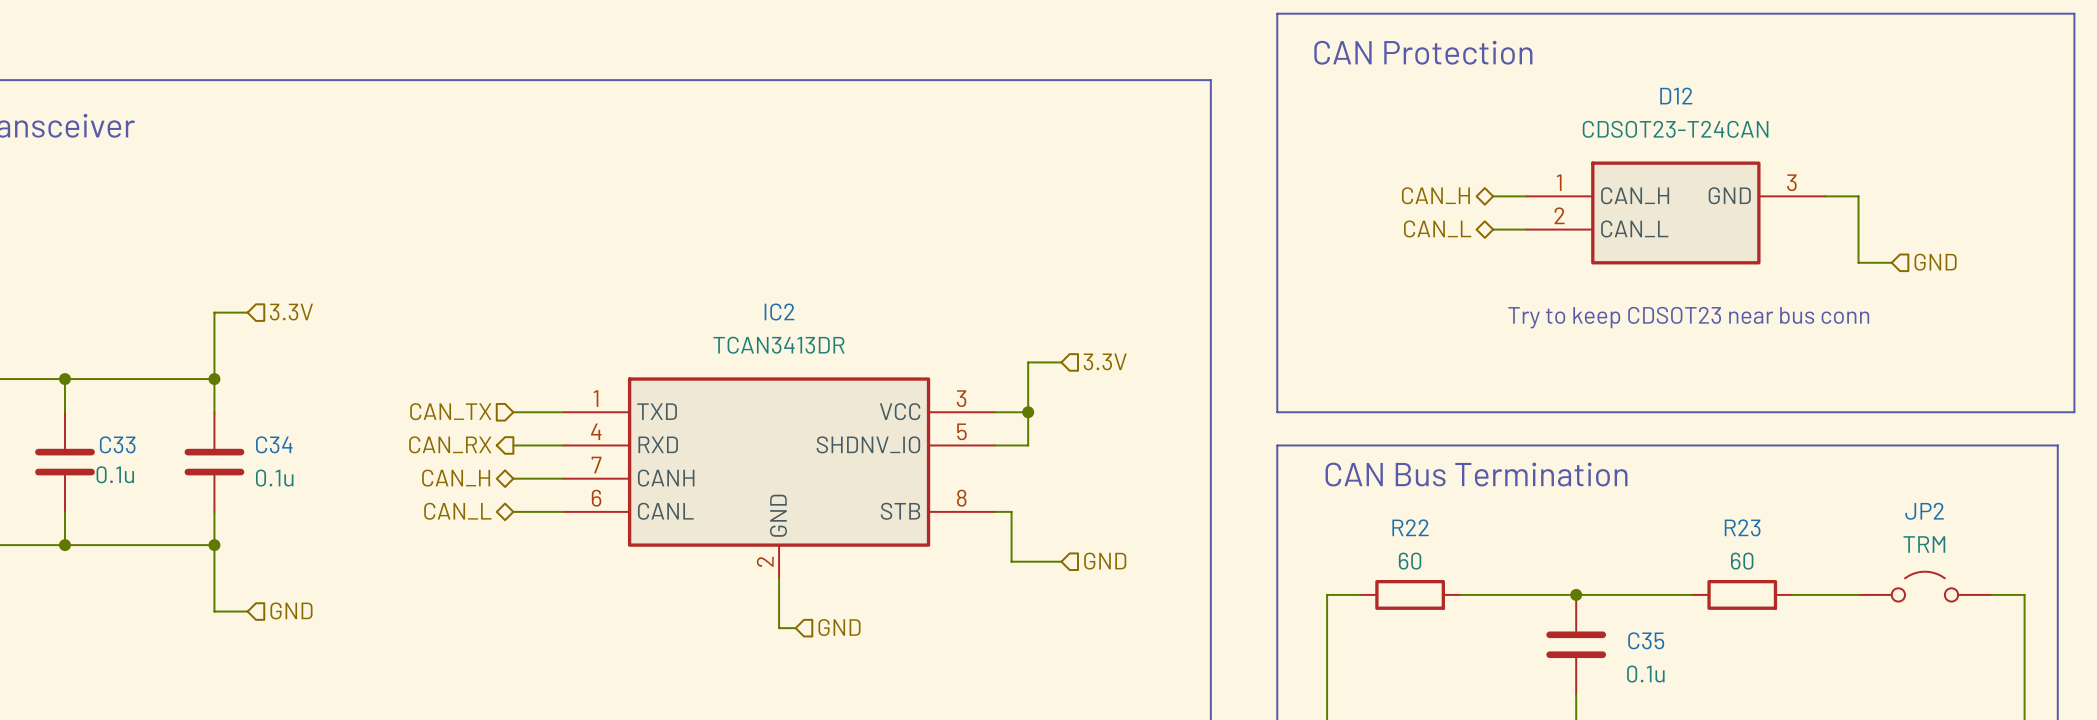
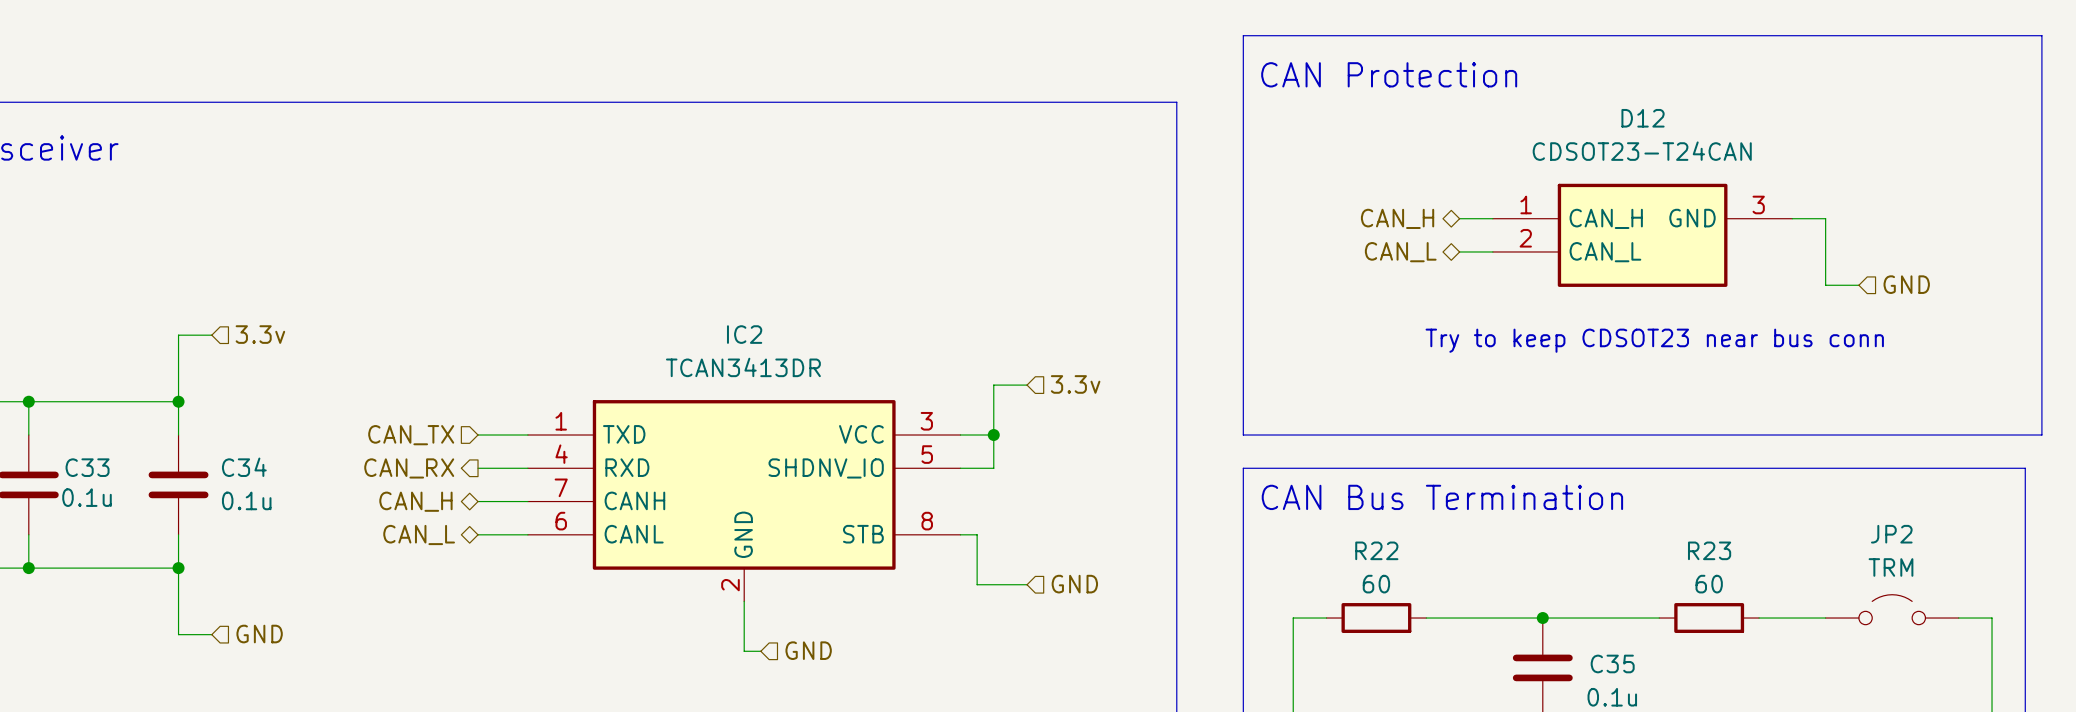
hierarchical label: 3.3V (291, 312) -> 3.3v (260, 334)
hierarchical label: 3.3V (1105, 361) -> 3.3v (1075, 384)

